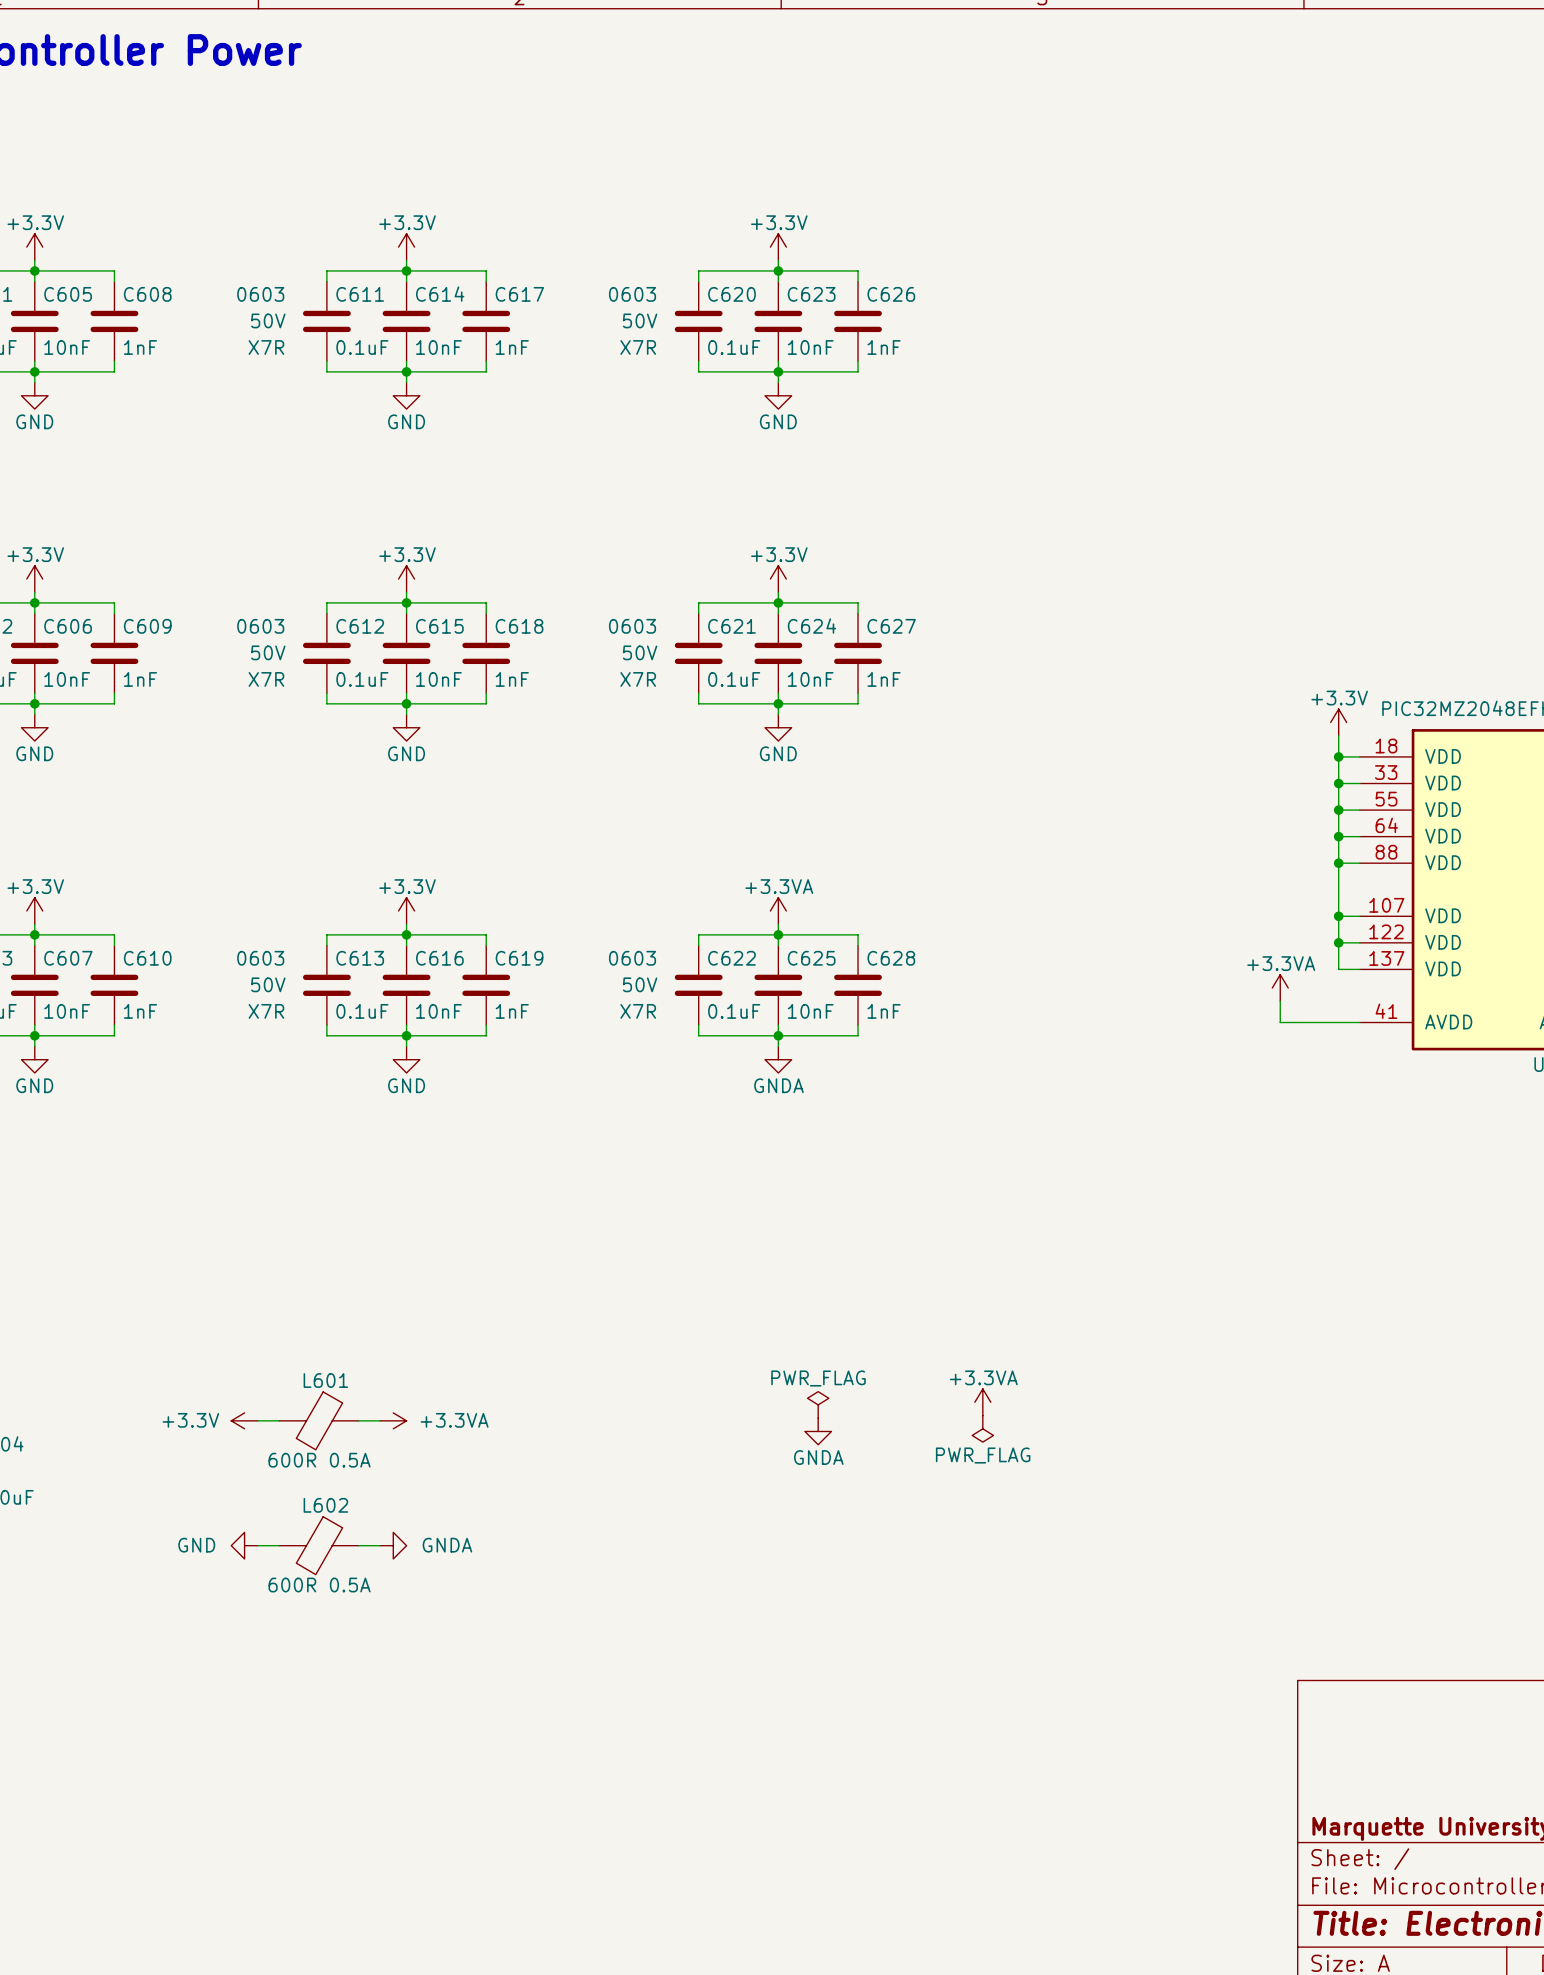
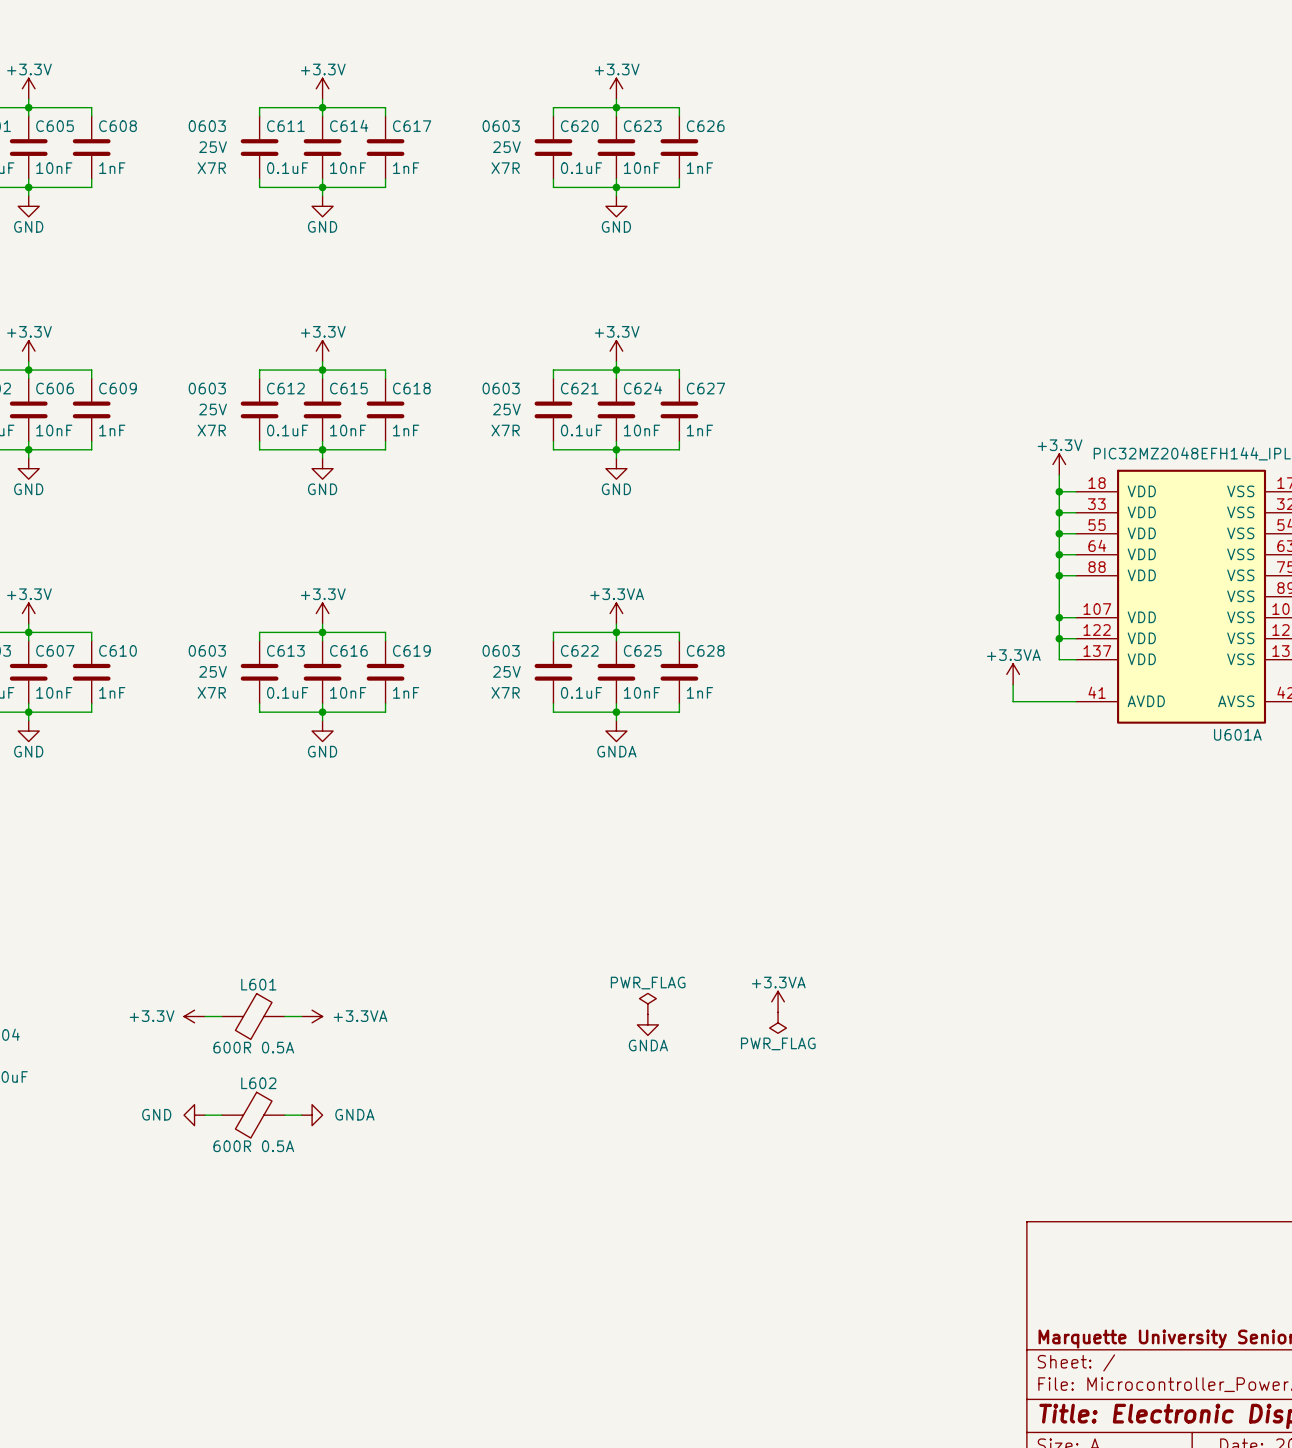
C611 text: 50V (268, 320) -> 25V (213, 147)
C620 text: 50V (640, 320) -> 25V (506, 147)
C612 text: 50V (268, 652) -> 25V (213, 409)
C621 text: 50V (640, 652) -> 25V (506, 409)
C613 text: 50V (268, 984) -> 25V (213, 671)
C622 text: 50V (640, 984) -> 25V (506, 671)

